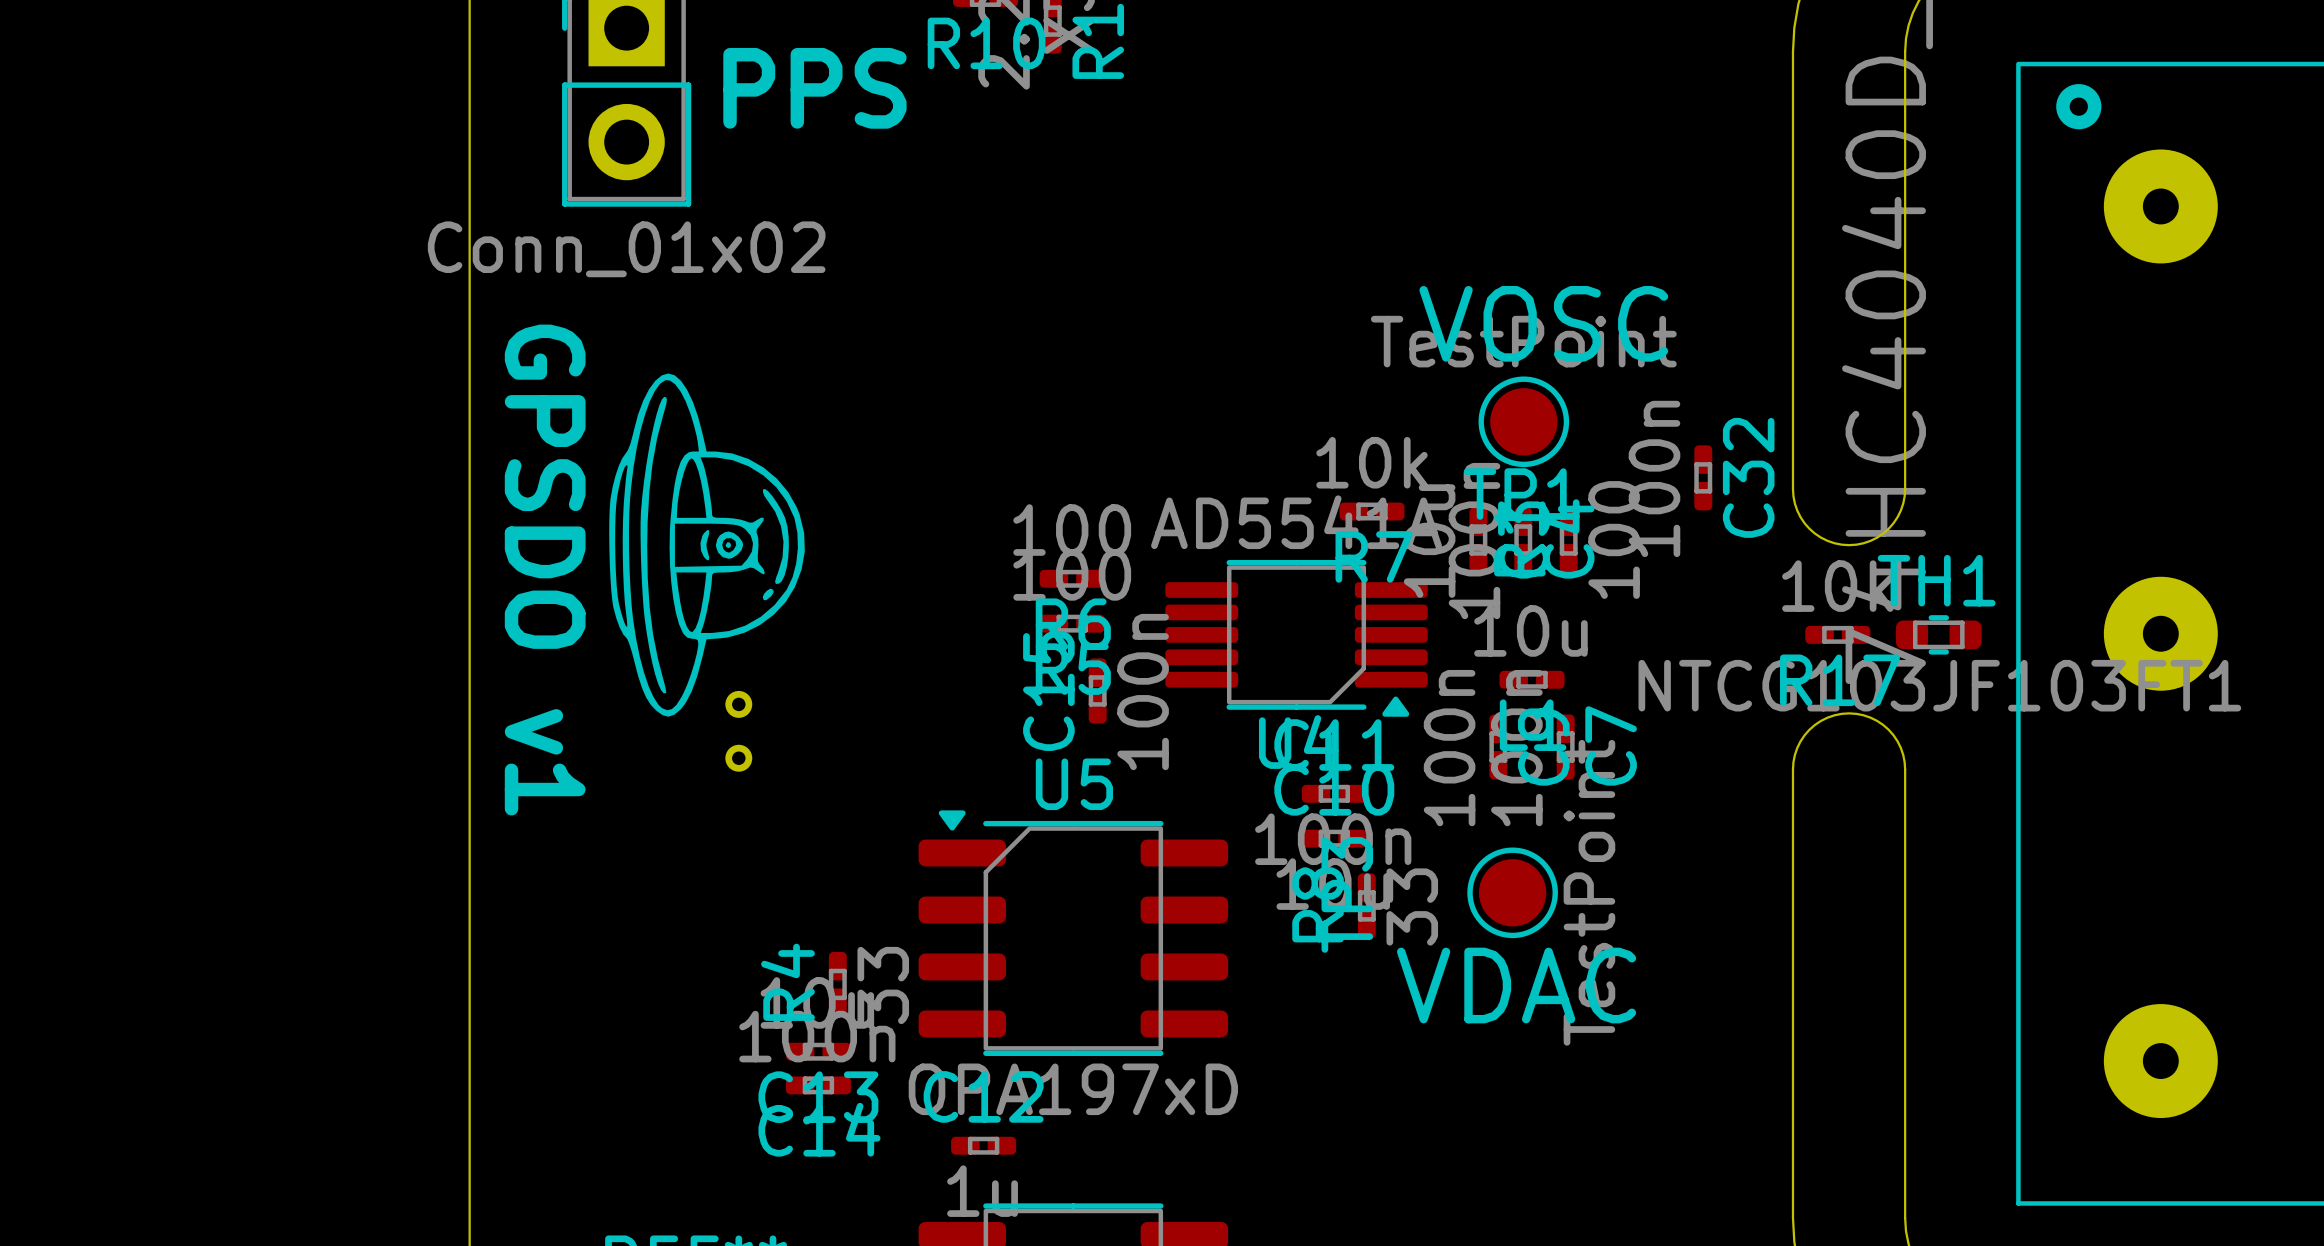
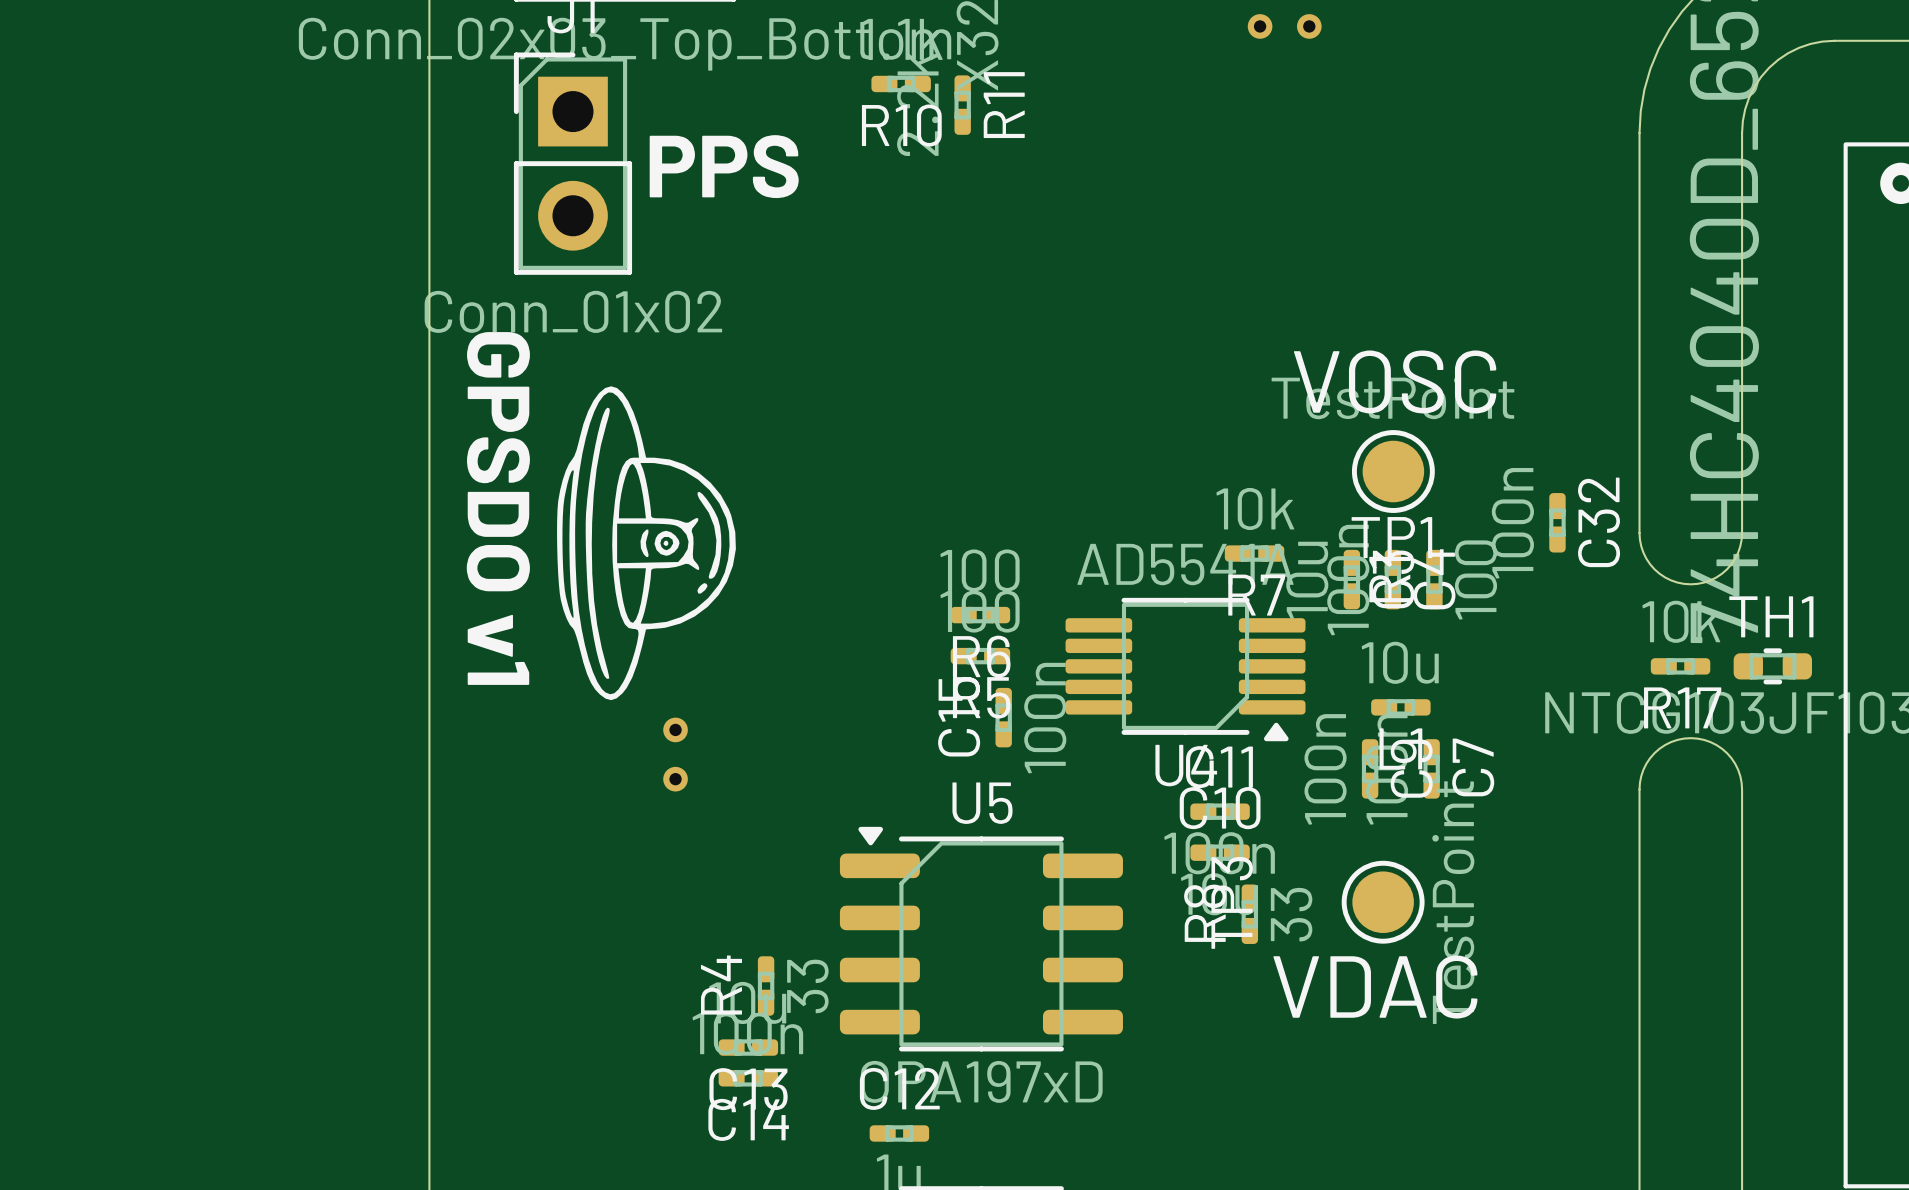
drawing position: (707, 545) -> (646, 543)
text position: GPSDO v1 (545, 570) -> GPSDO v1 (498, 508)

